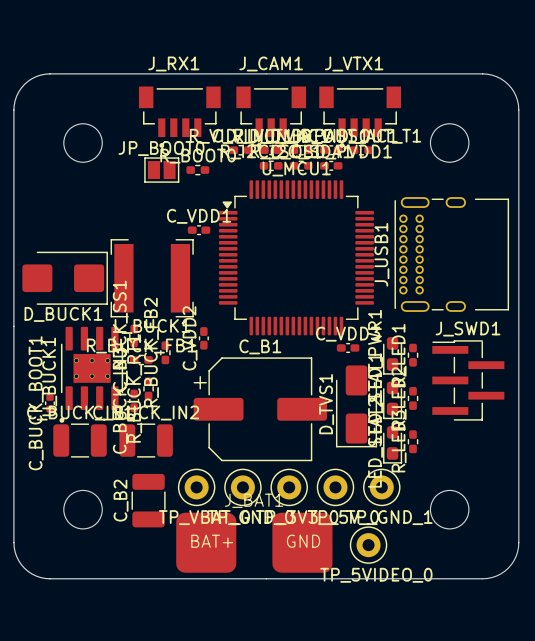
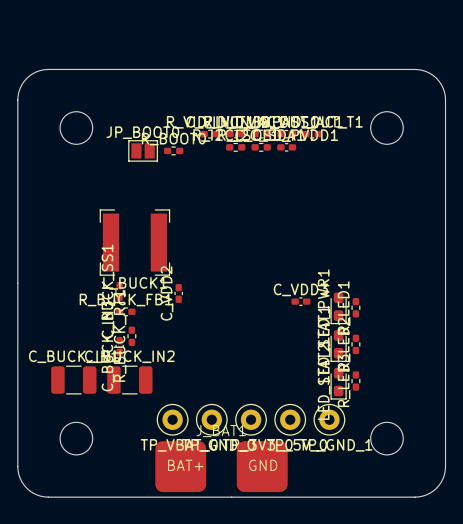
J_RX1: (179, 117) -> none
J_CAM1: (271, 117) -> none
J_VTX1: (360, 117) -> none
C_VDD1: (199, 230) -> none
J_USB1: (451, 254) -> none
U_MCU1: (296, 257) -> none
D_BUCK1: (65, 278) -> none
R_BUCK_FB2: (165, 352) -> none
U_BUCK1: (91, 374) -> none
J_SWD1: (468, 380) -> none
C_BUCK_BOOT1: (49, 403) -> none
D_TVS1: (356, 406) -> none
C_B1: (260, 409) -> none
C_B2: (148, 500) -> none
TP_5VIDEO_0: (368, 545) -> none

